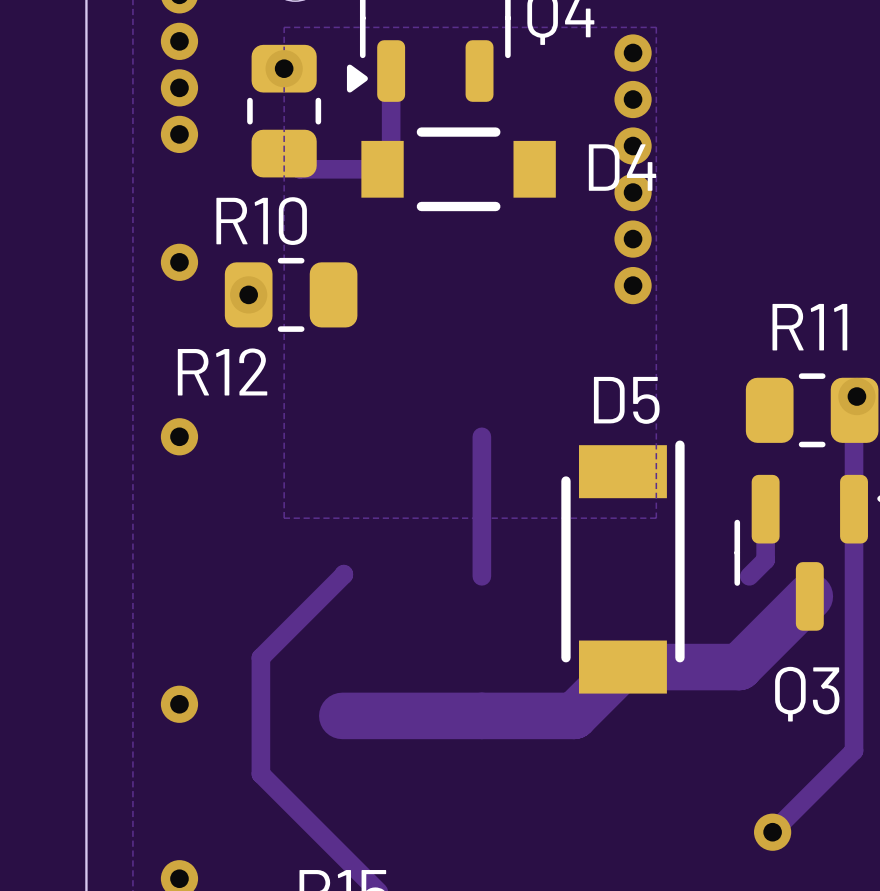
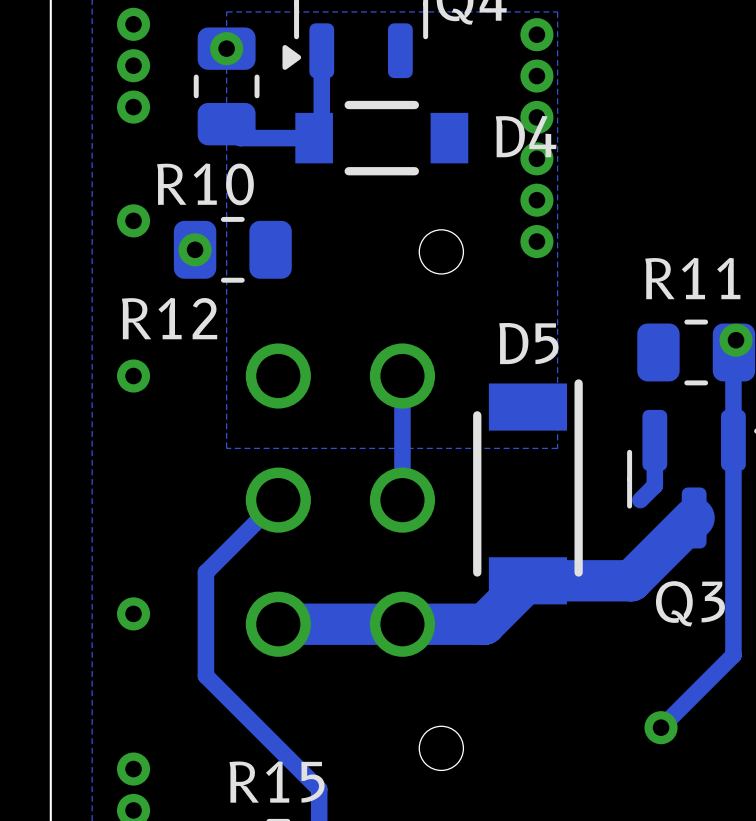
part: none -> (354, 500)

